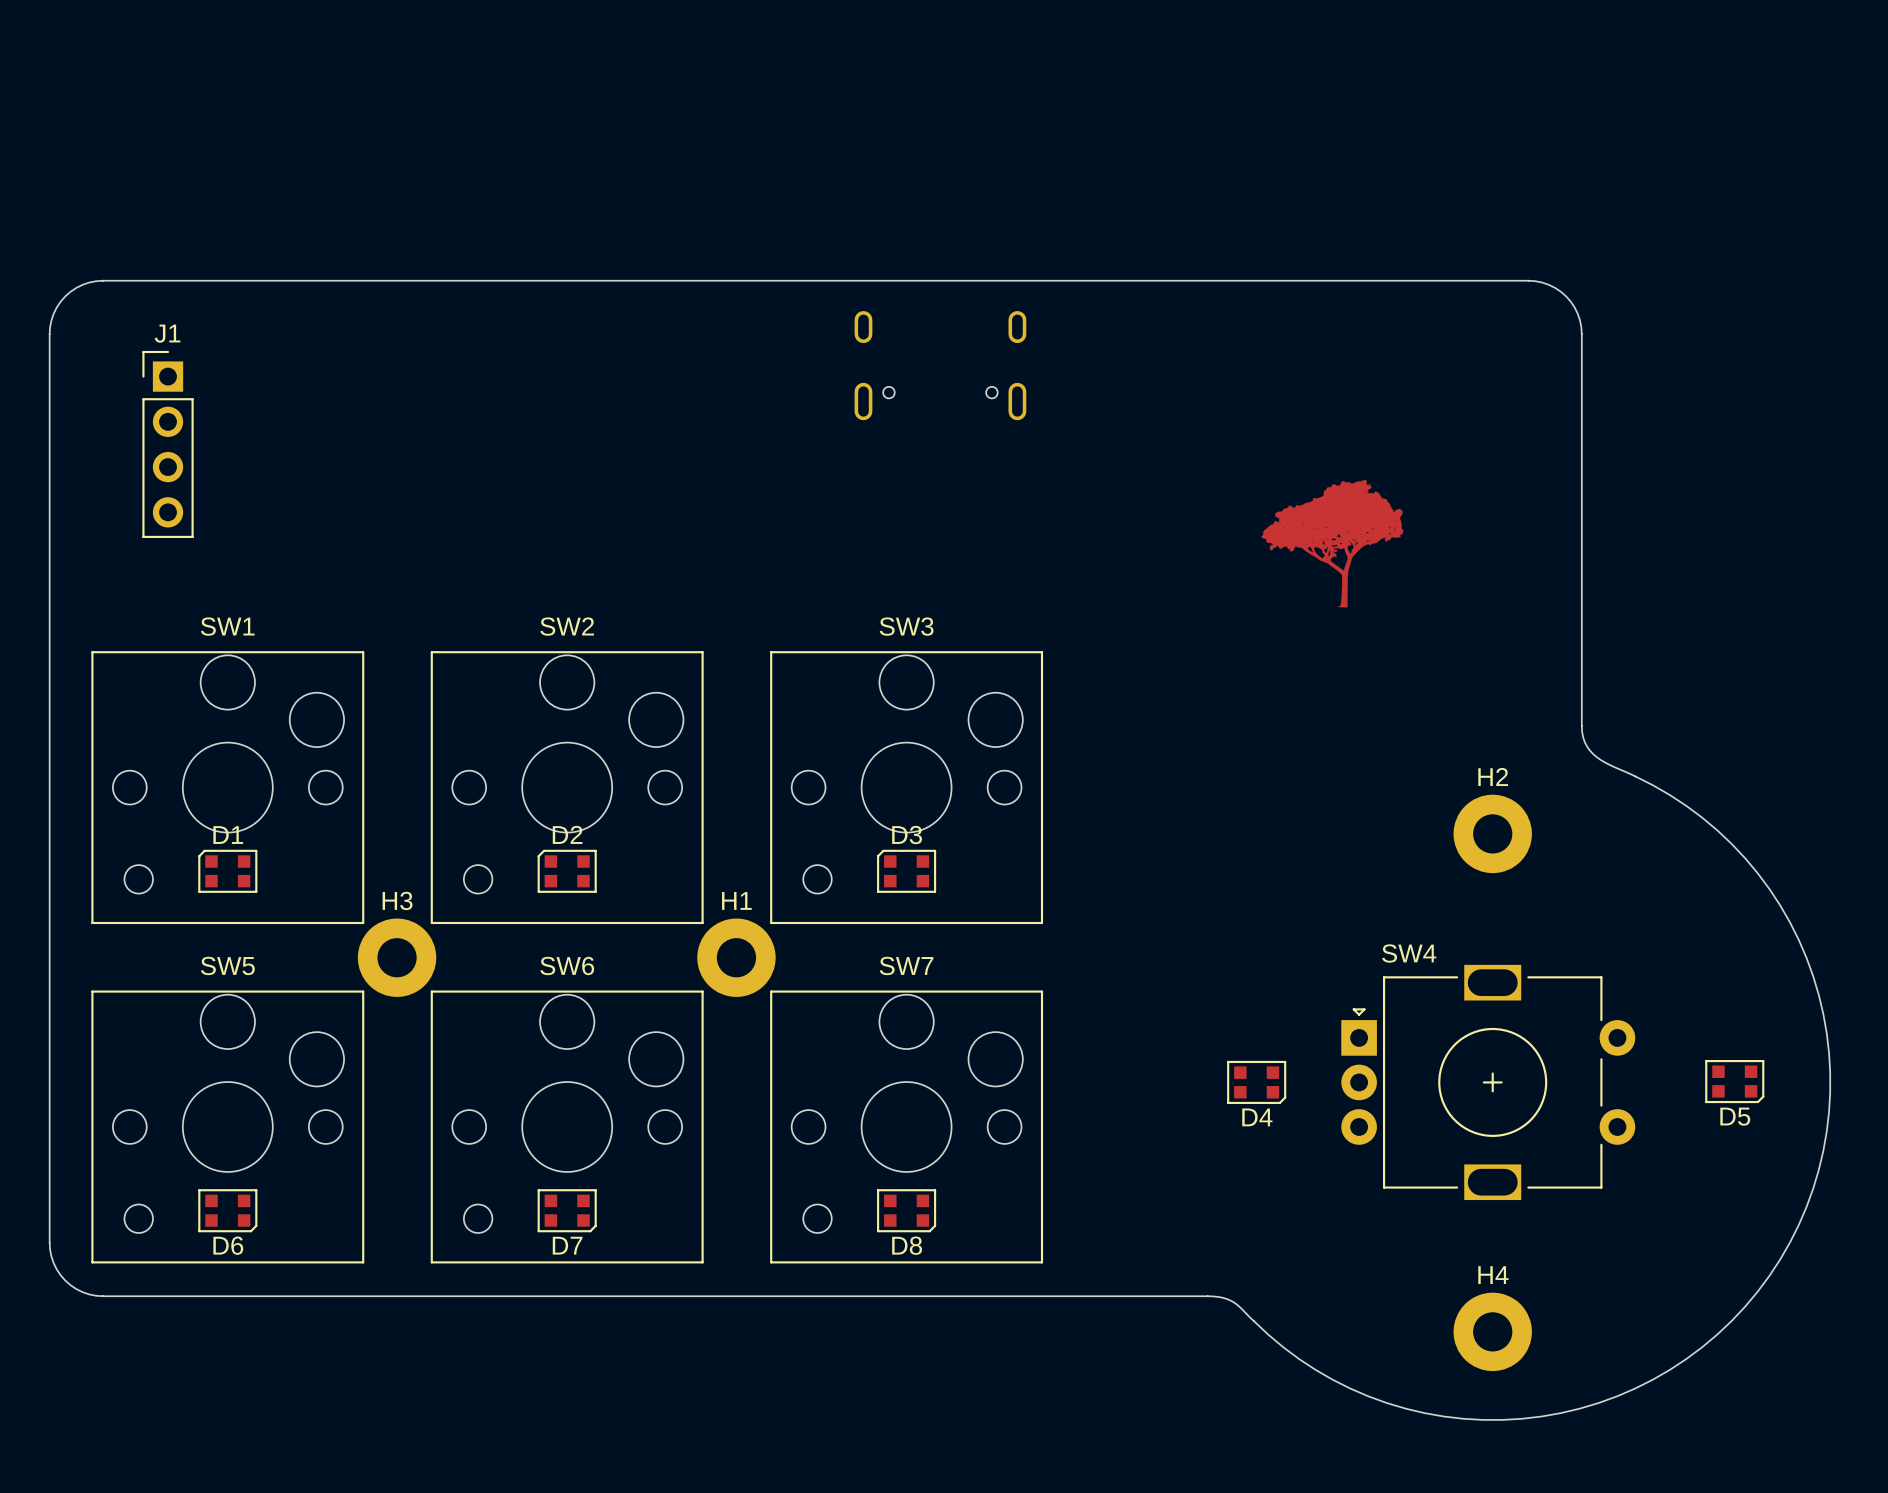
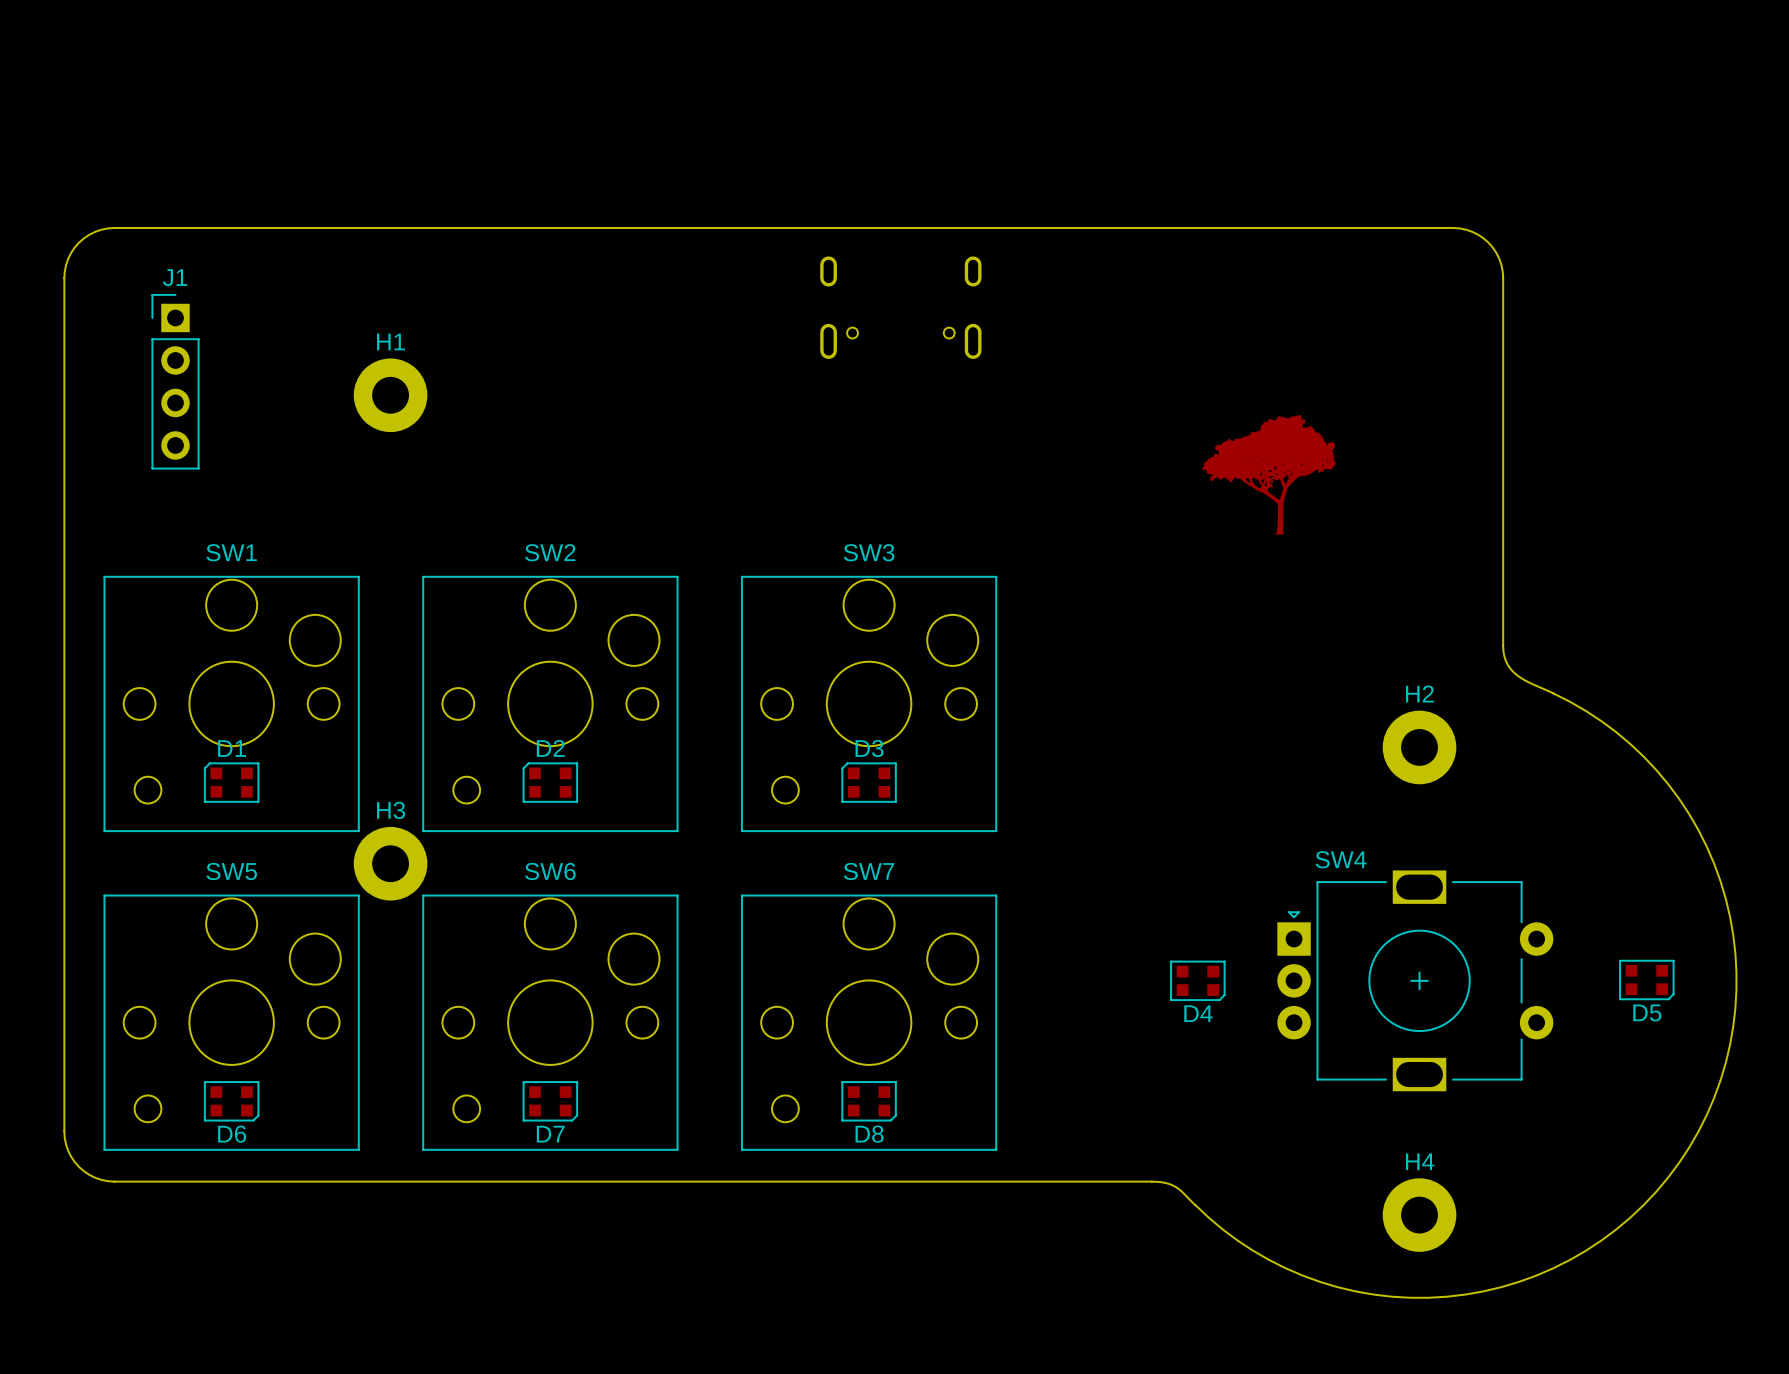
H1 position: (736, 957) -> (390, 395)

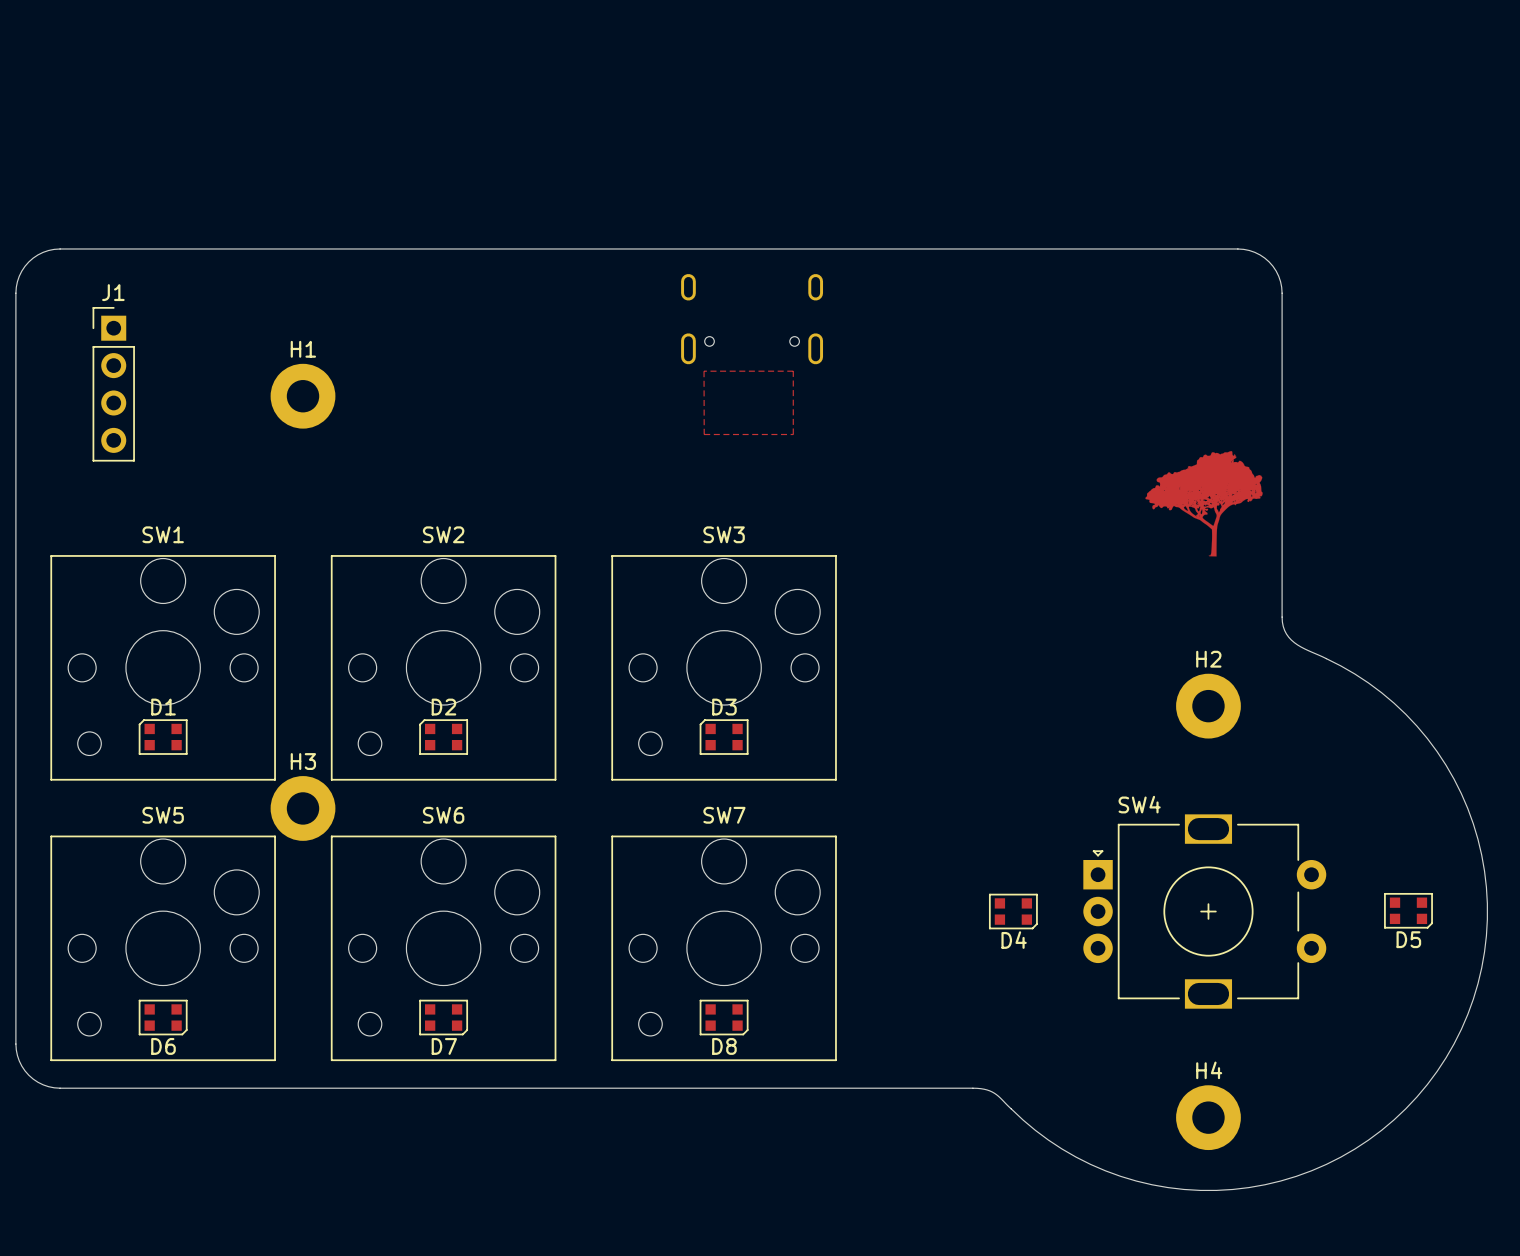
zone outline: none -> (704, 371) (793, 371) (793, 434) (704, 434) (704, 371)
part position: (1268, 474) -> (1204, 503)

